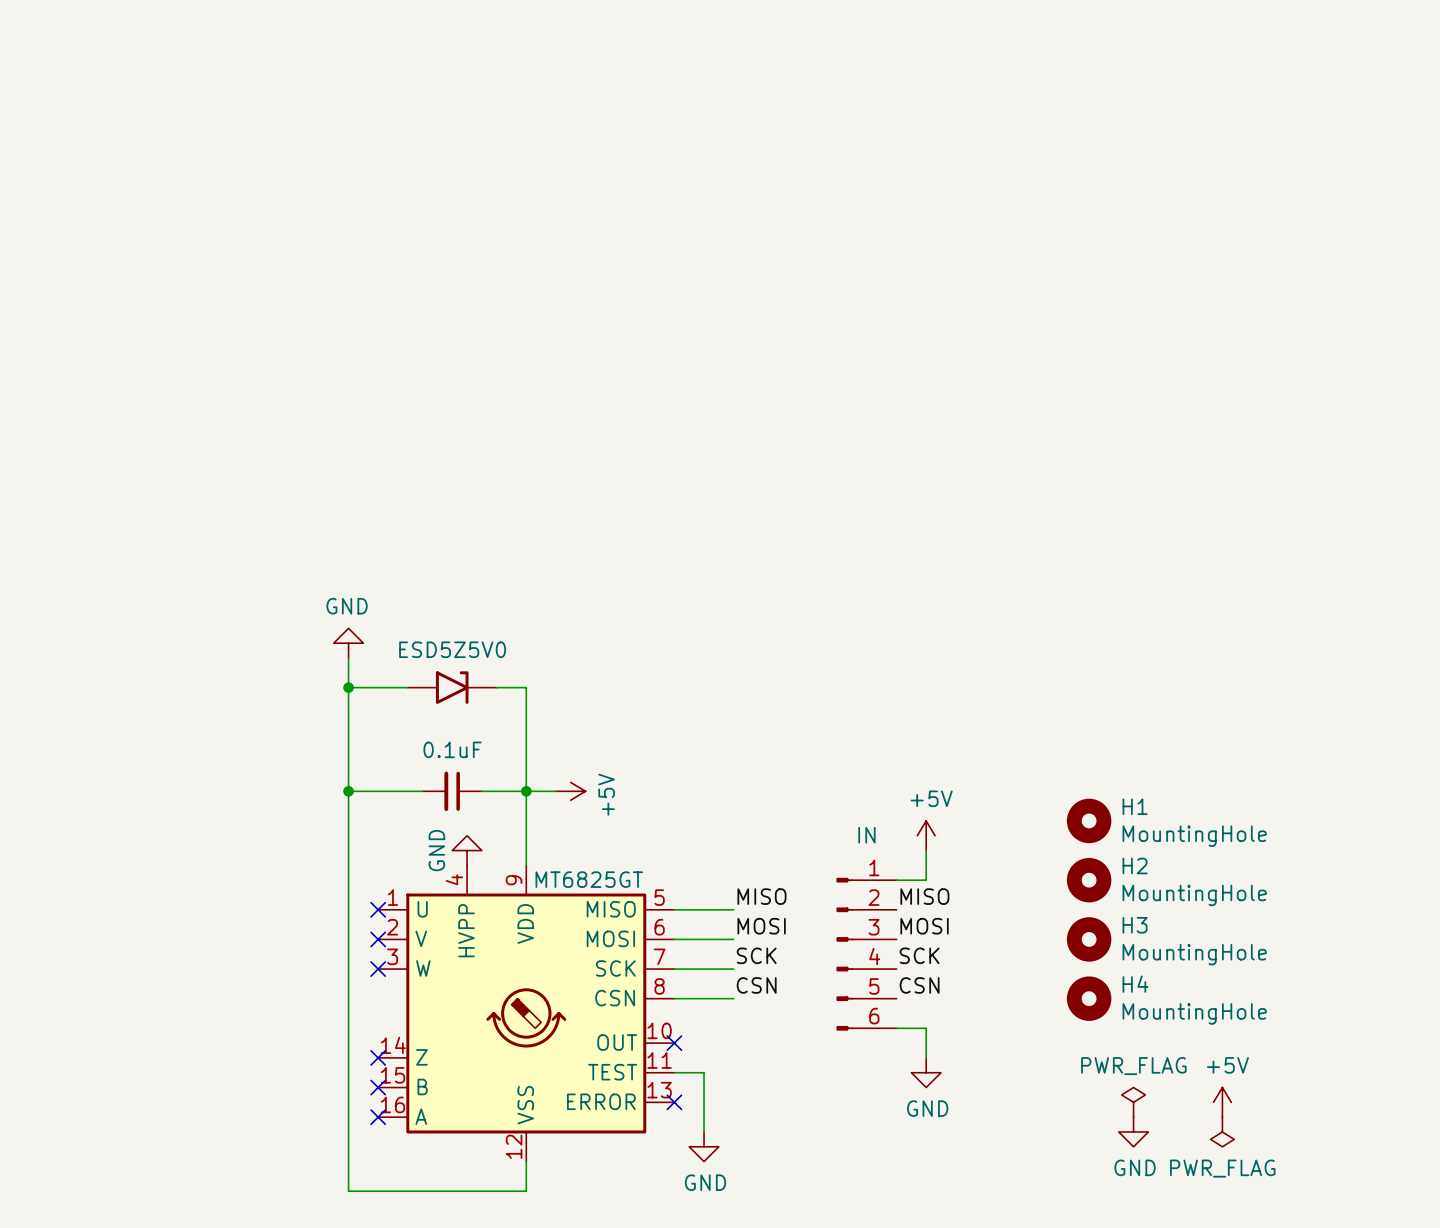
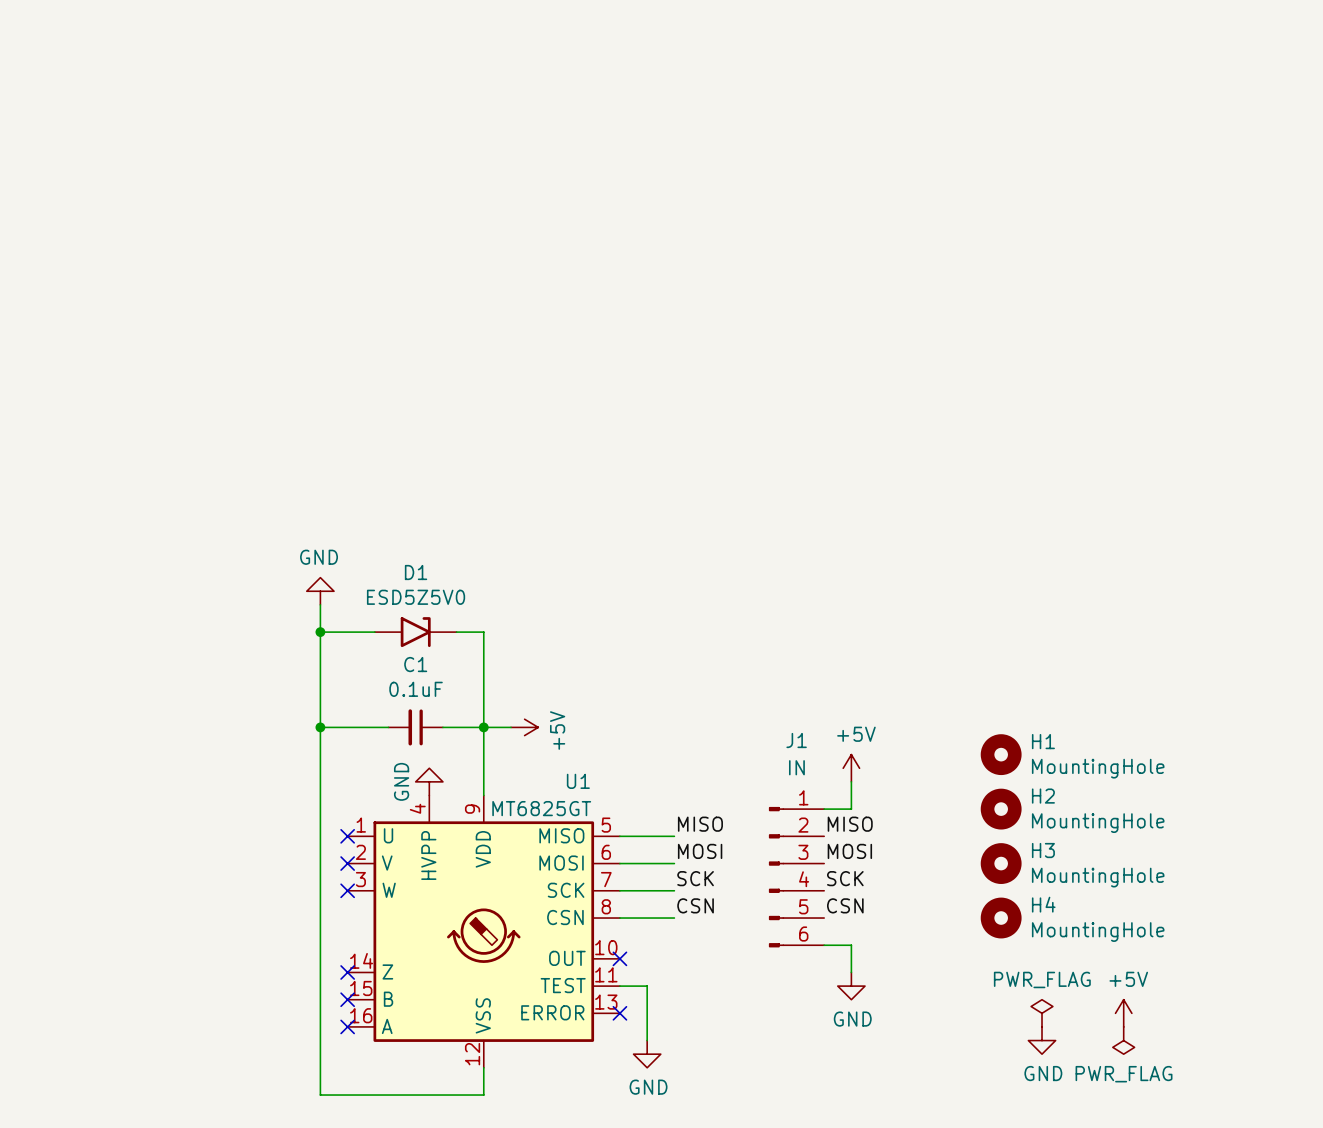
D1 name: none -> D1 (416, 572)
C1 name: none -> C1 (415, 664)
J1 name: none -> J1 (796, 740)
U1 name: none -> U1 (578, 781)

